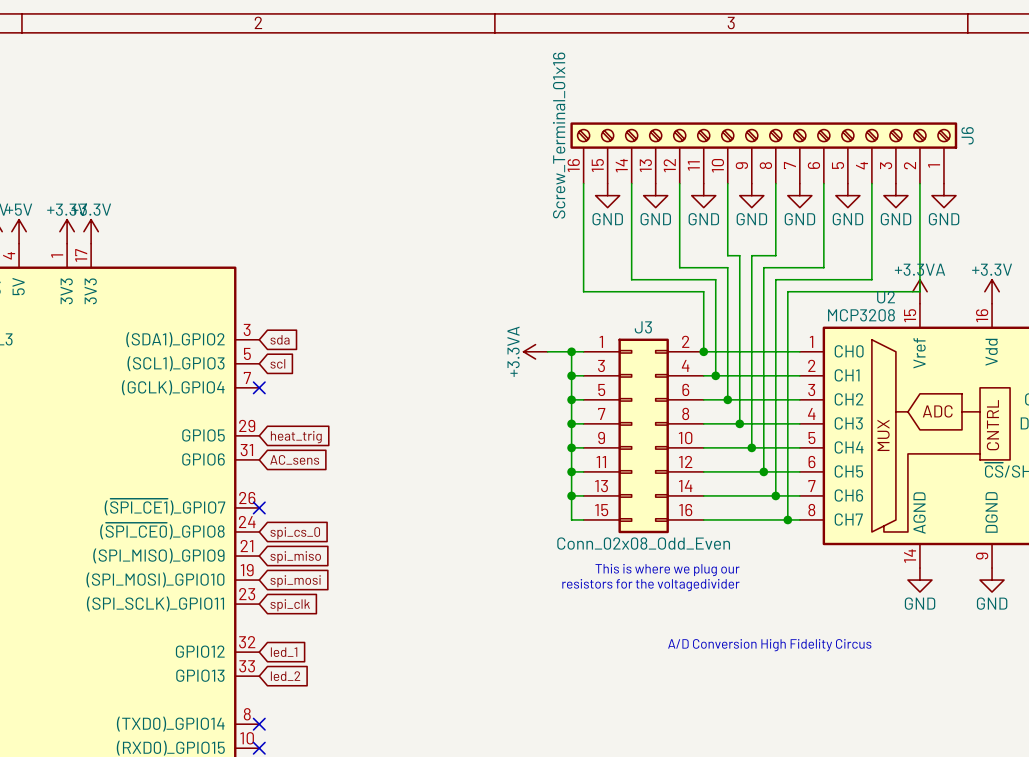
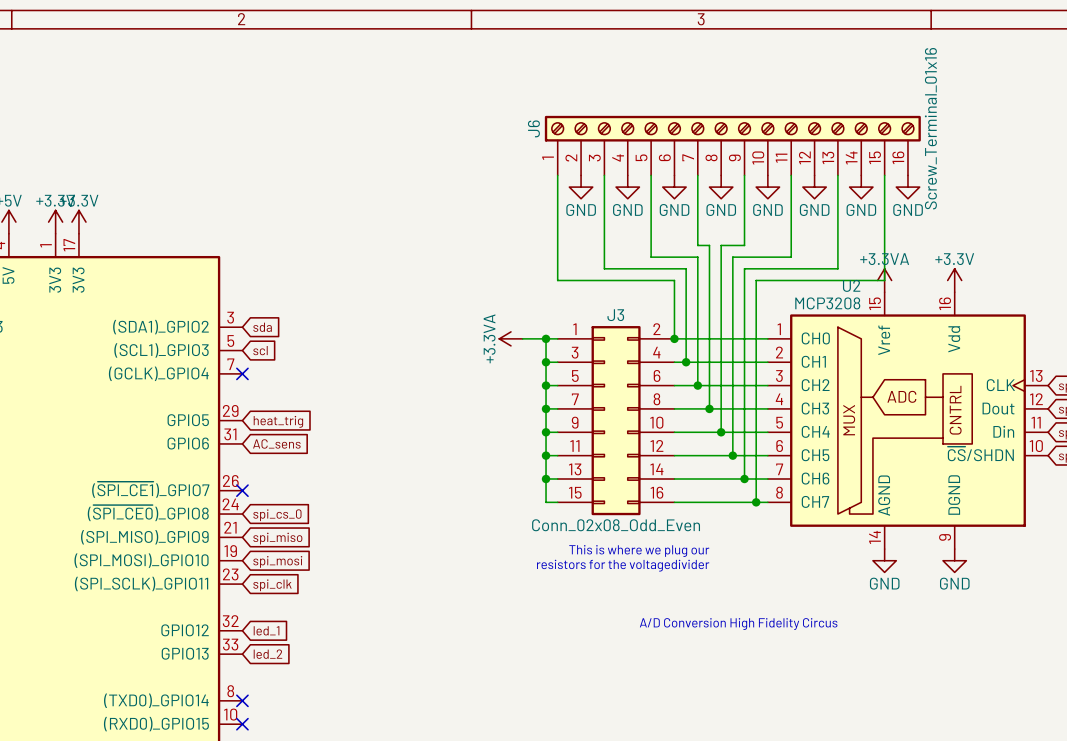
J6 flip: as is (763, 135) -> left-right (732, 128)

